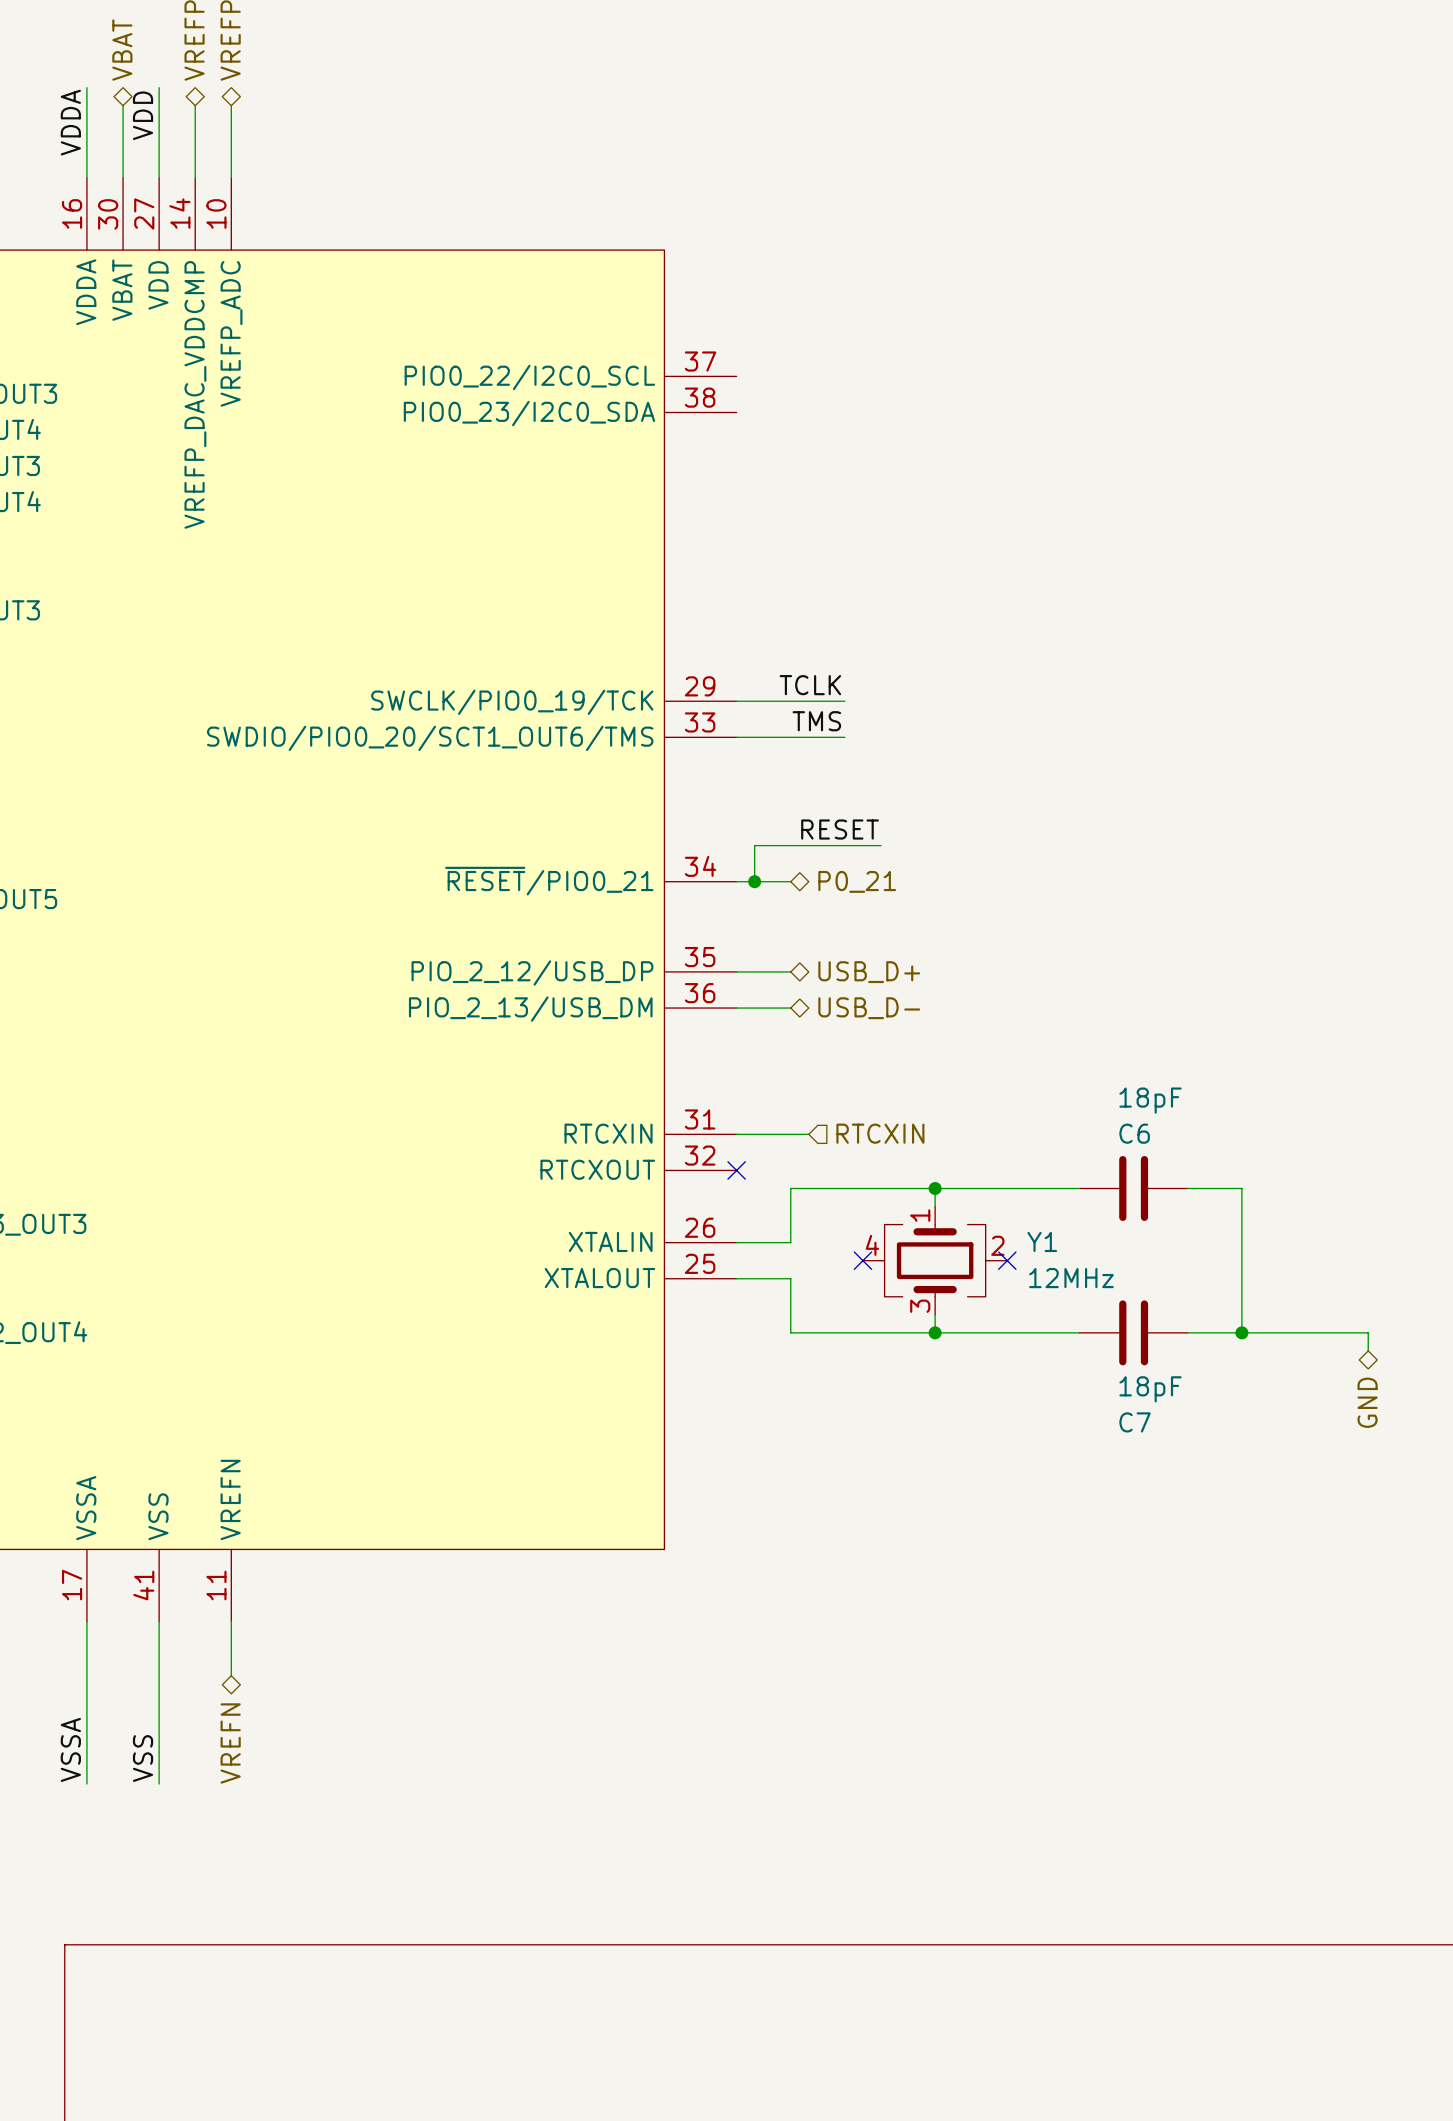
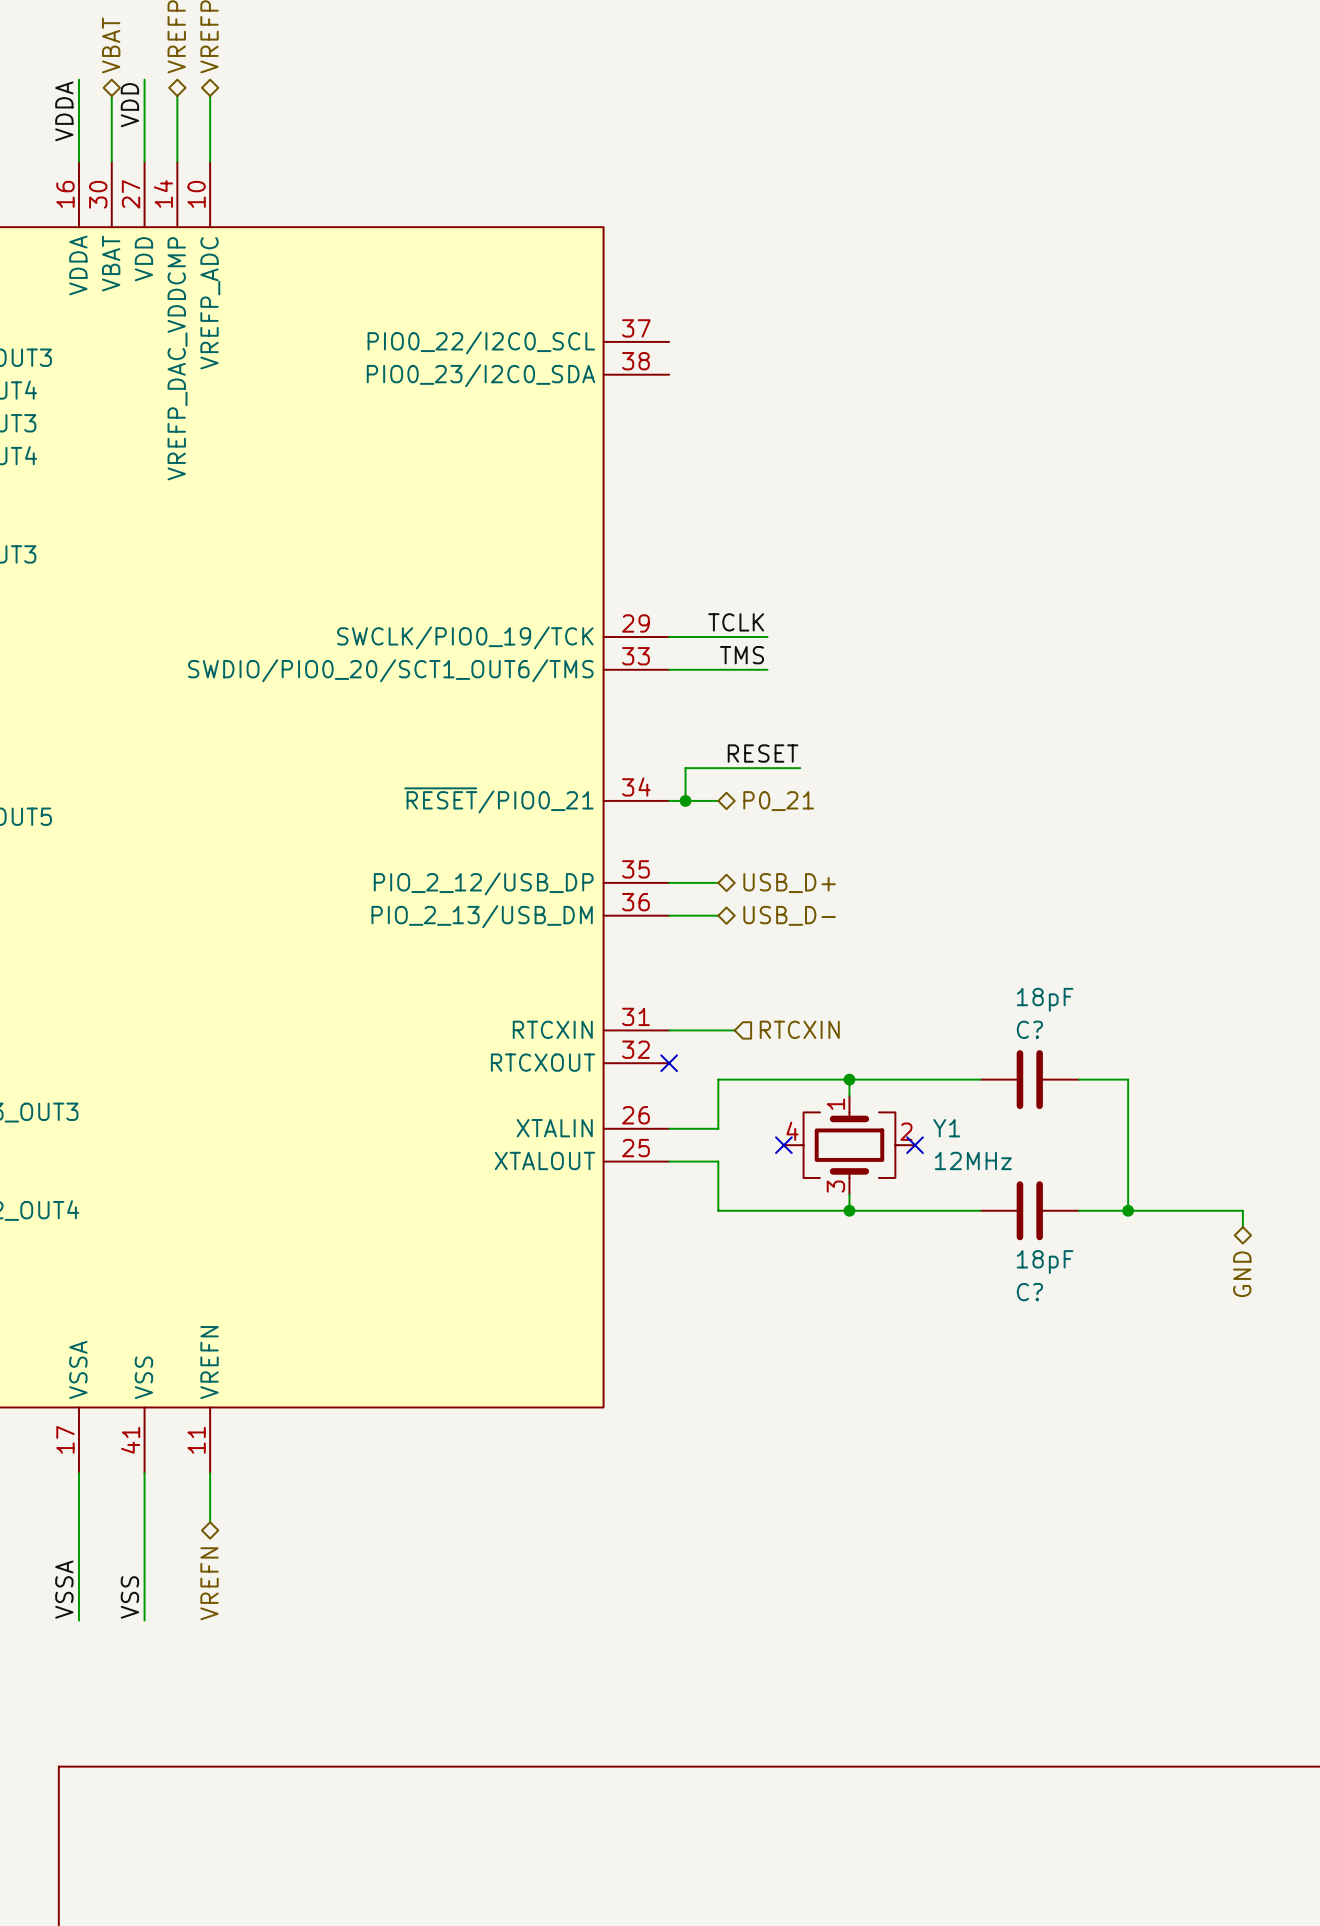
C6 name: C6 (1134, 1133) -> C? (1029, 1029)
C7 name: C7 (1135, 1422) -> C? (1029, 1292)

